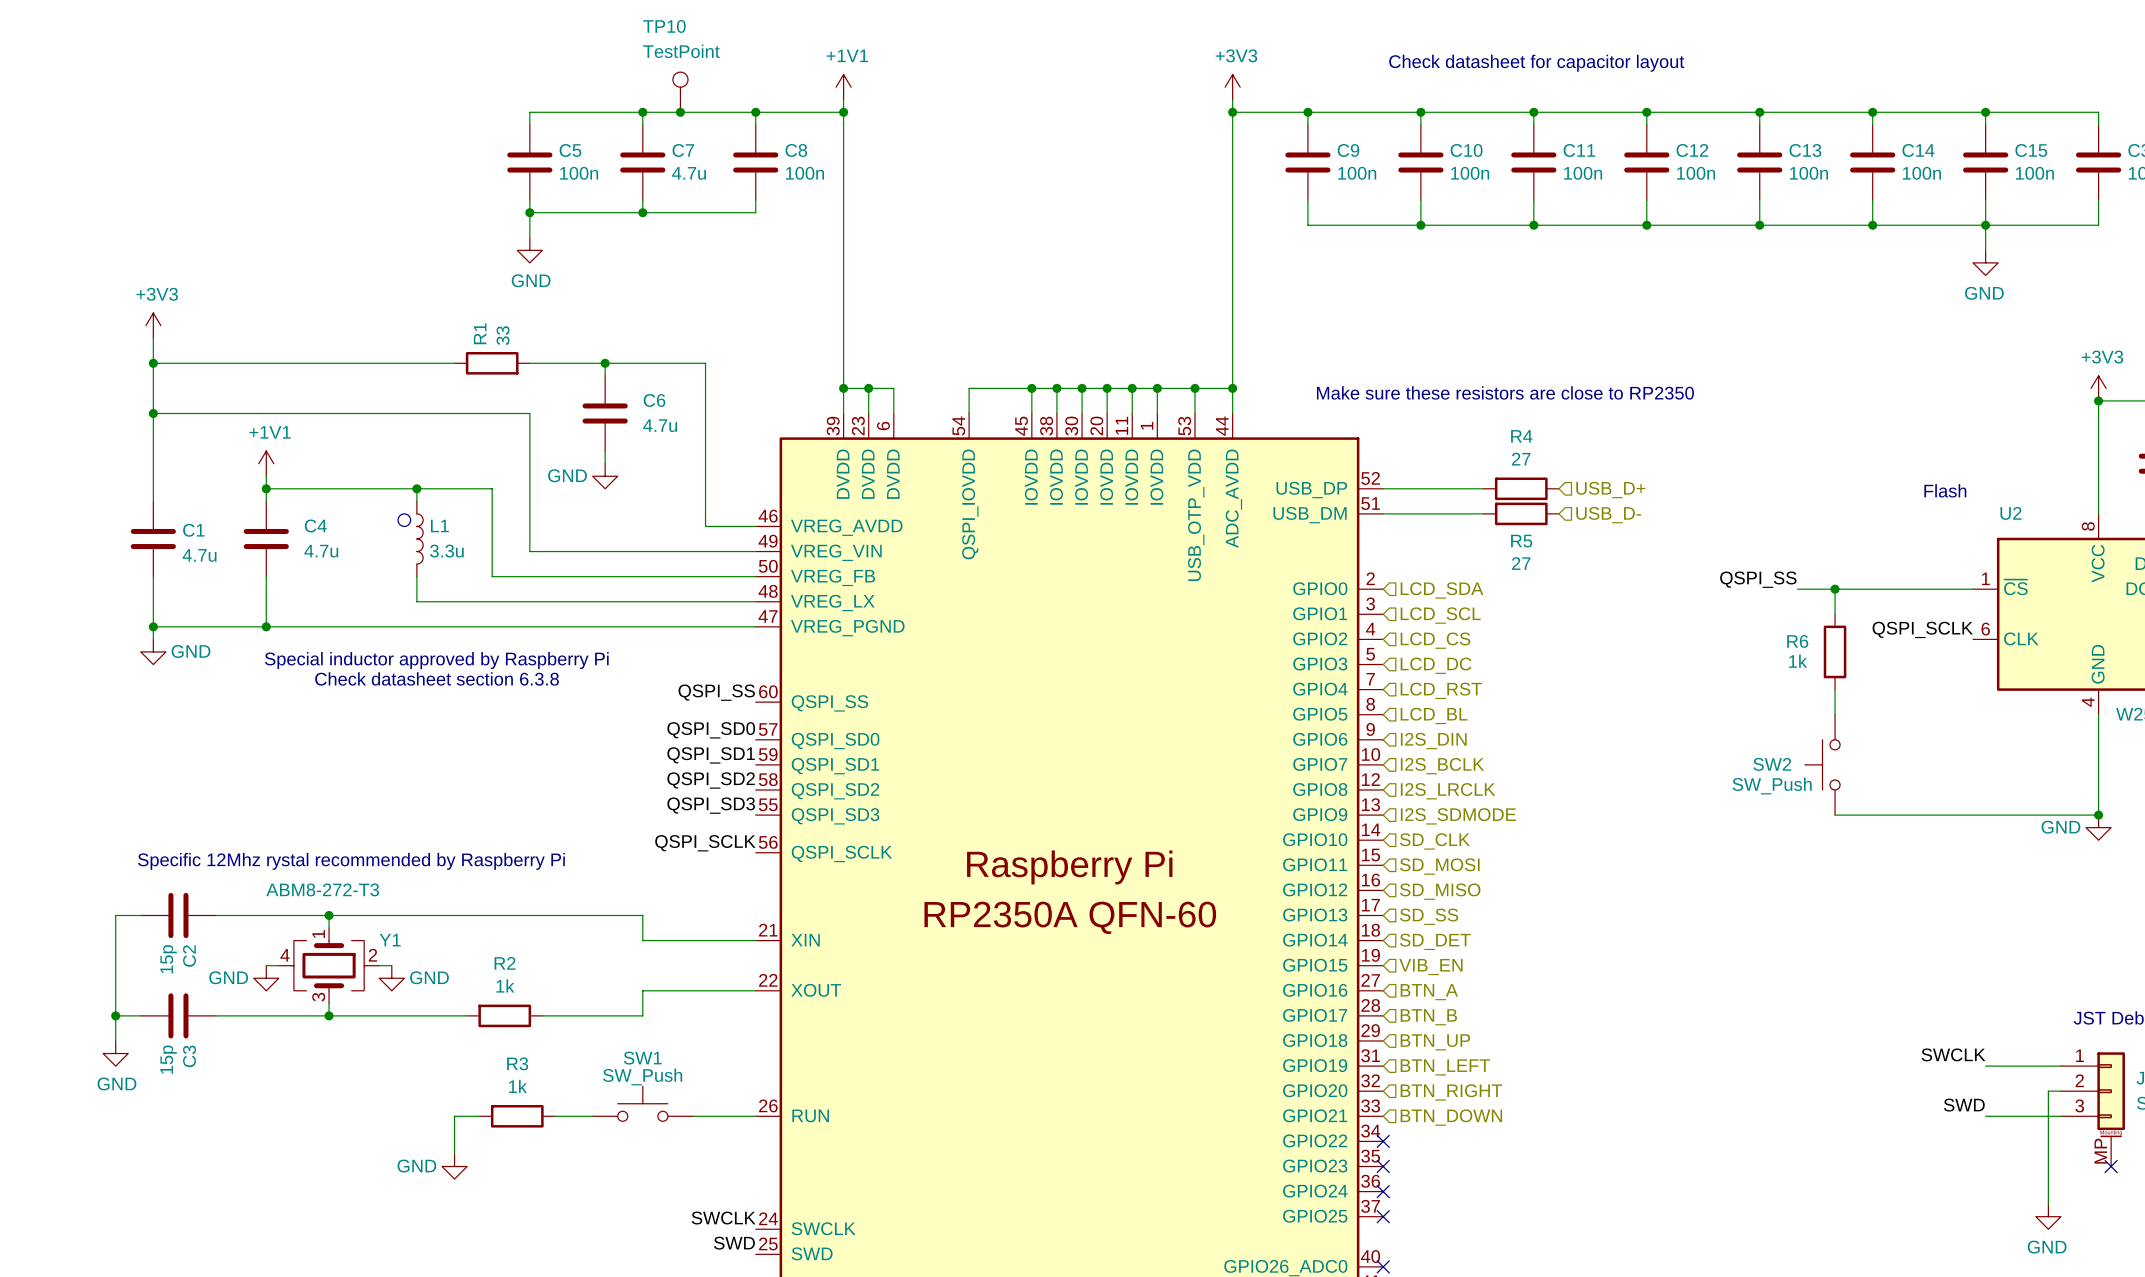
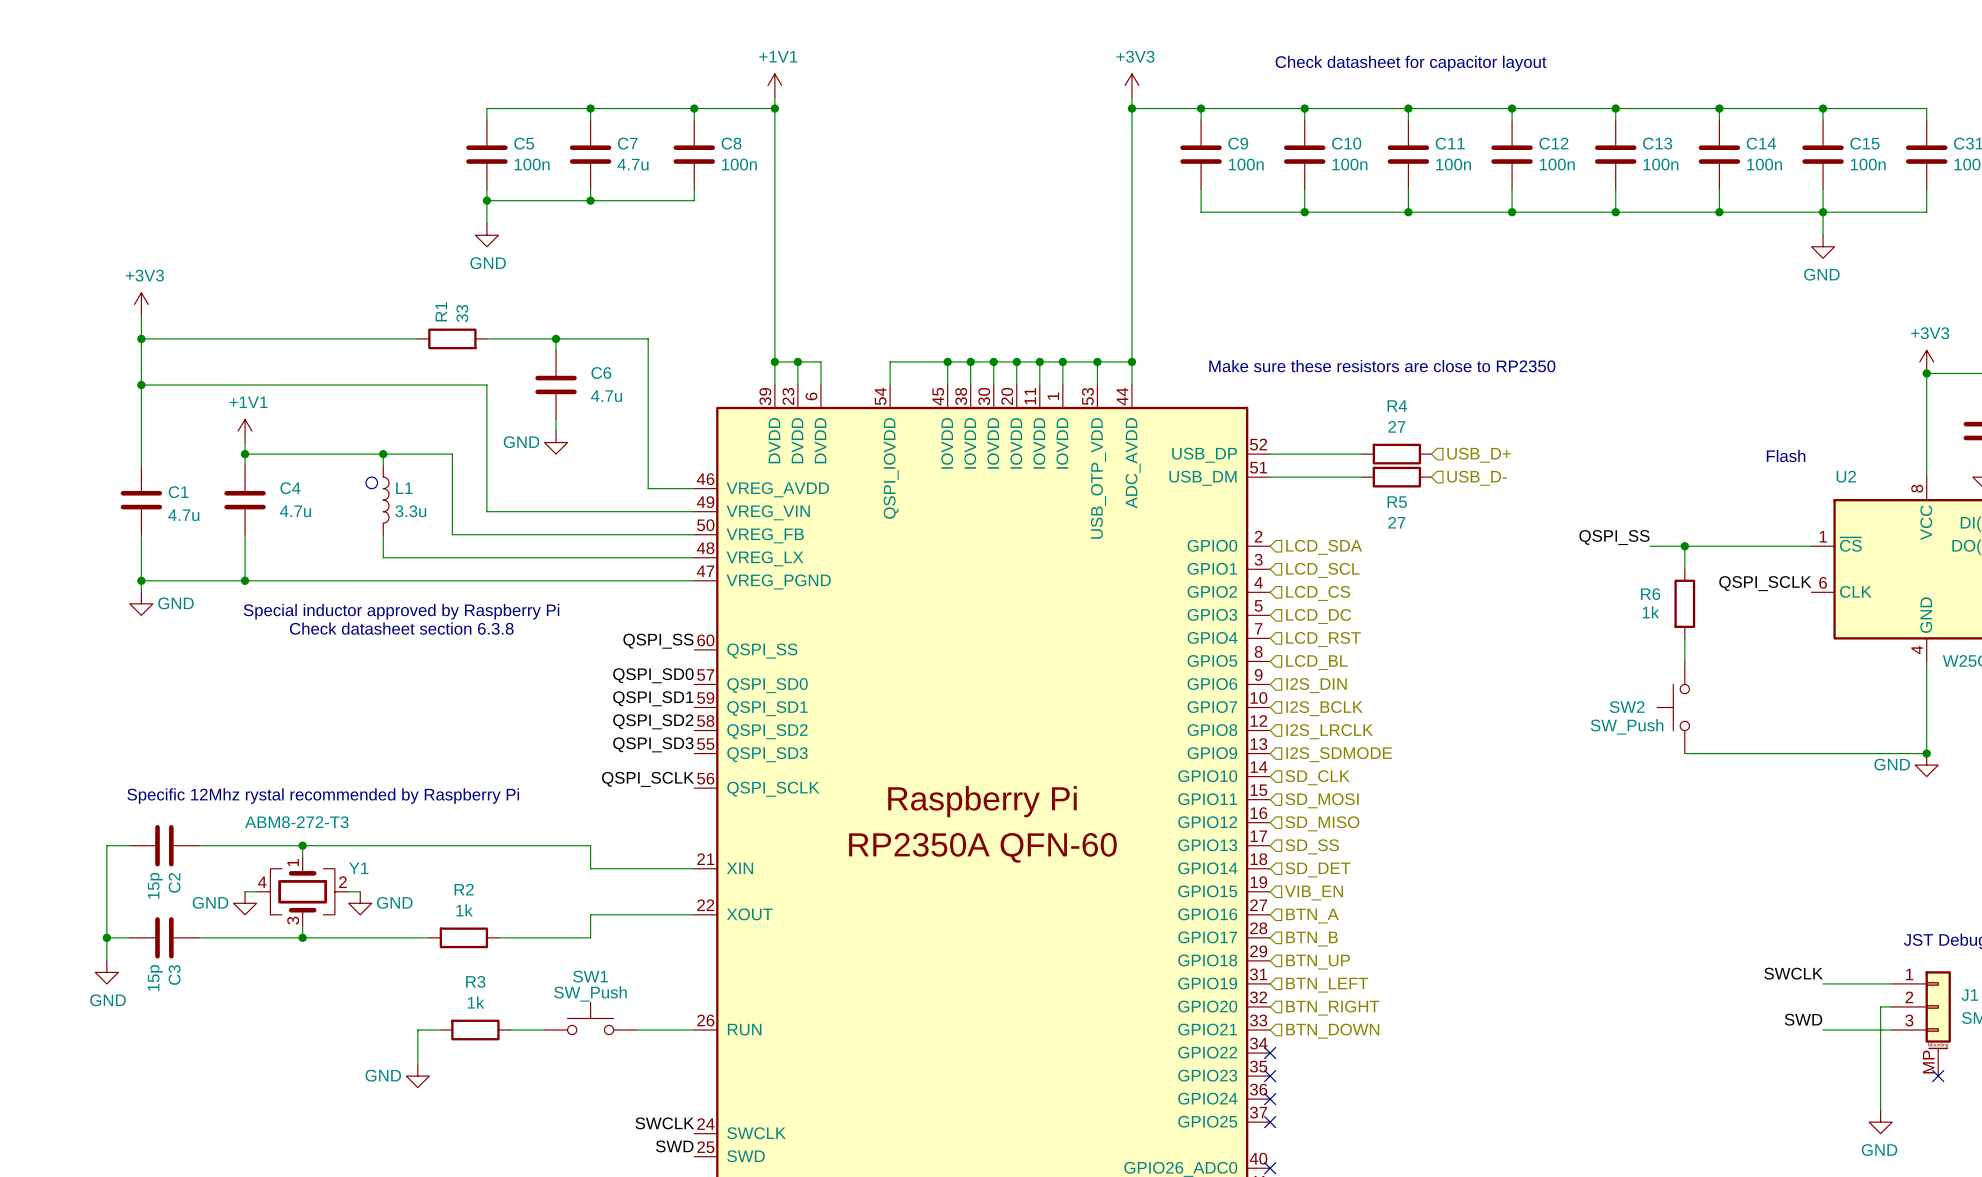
TP10: TestPoint (680, 92) -> none
junction: (680, 112) -> none

